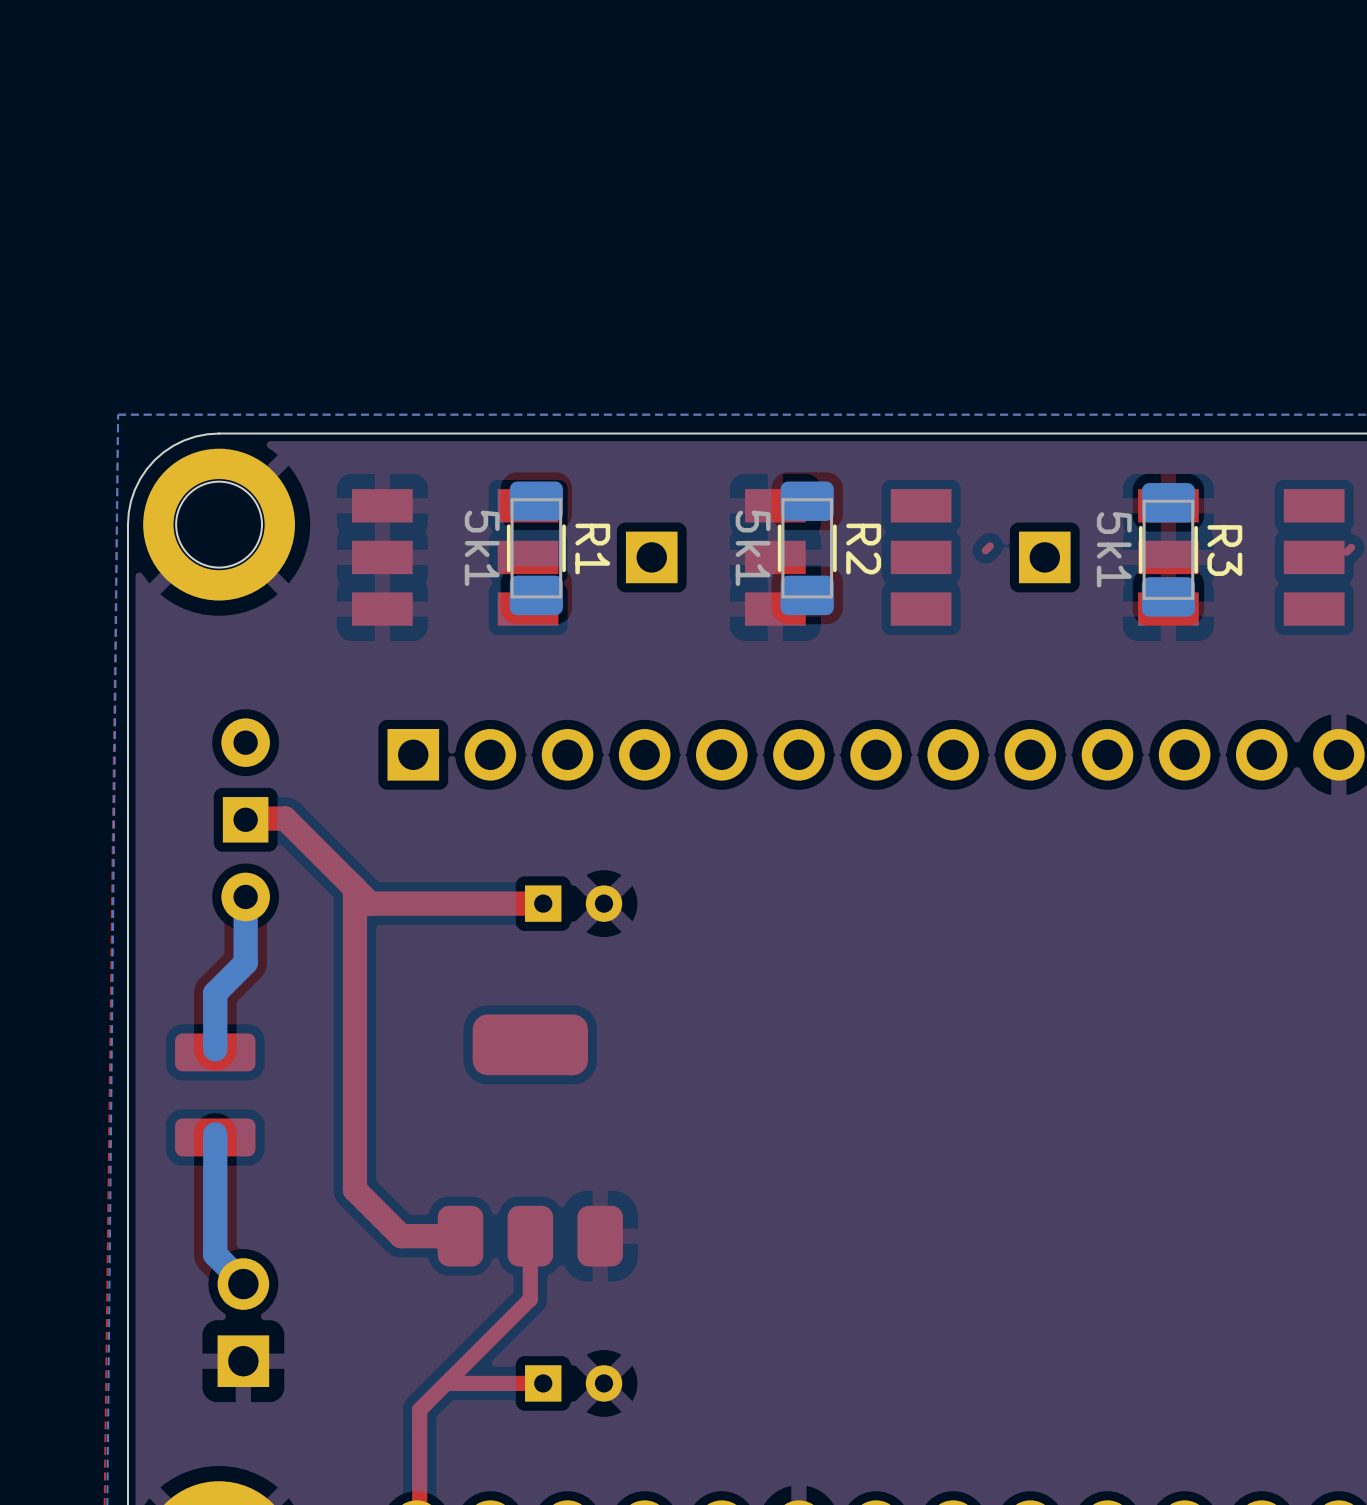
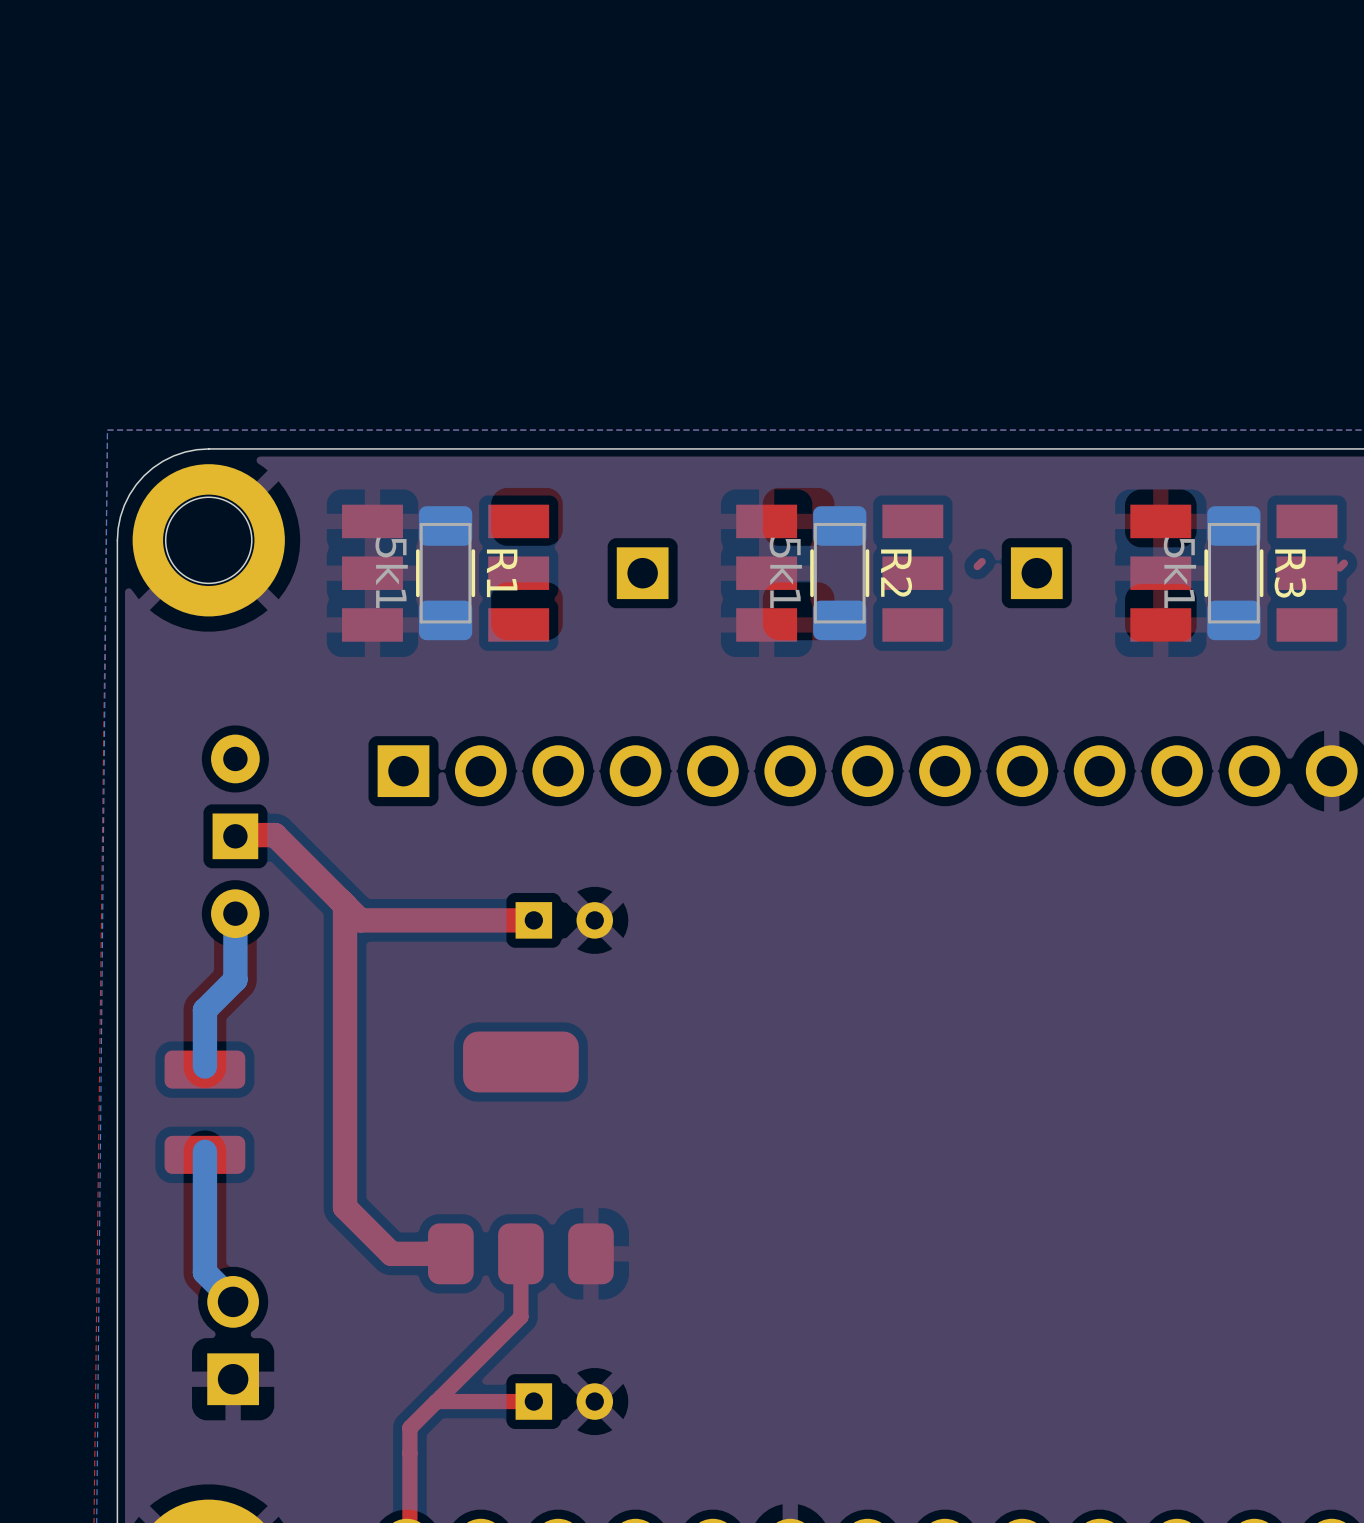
R1 position: (536, 548) -> (445, 573)
R2 position: (807, 548) -> (839, 573)
R3 position: (1168, 549) -> (1233, 573)

